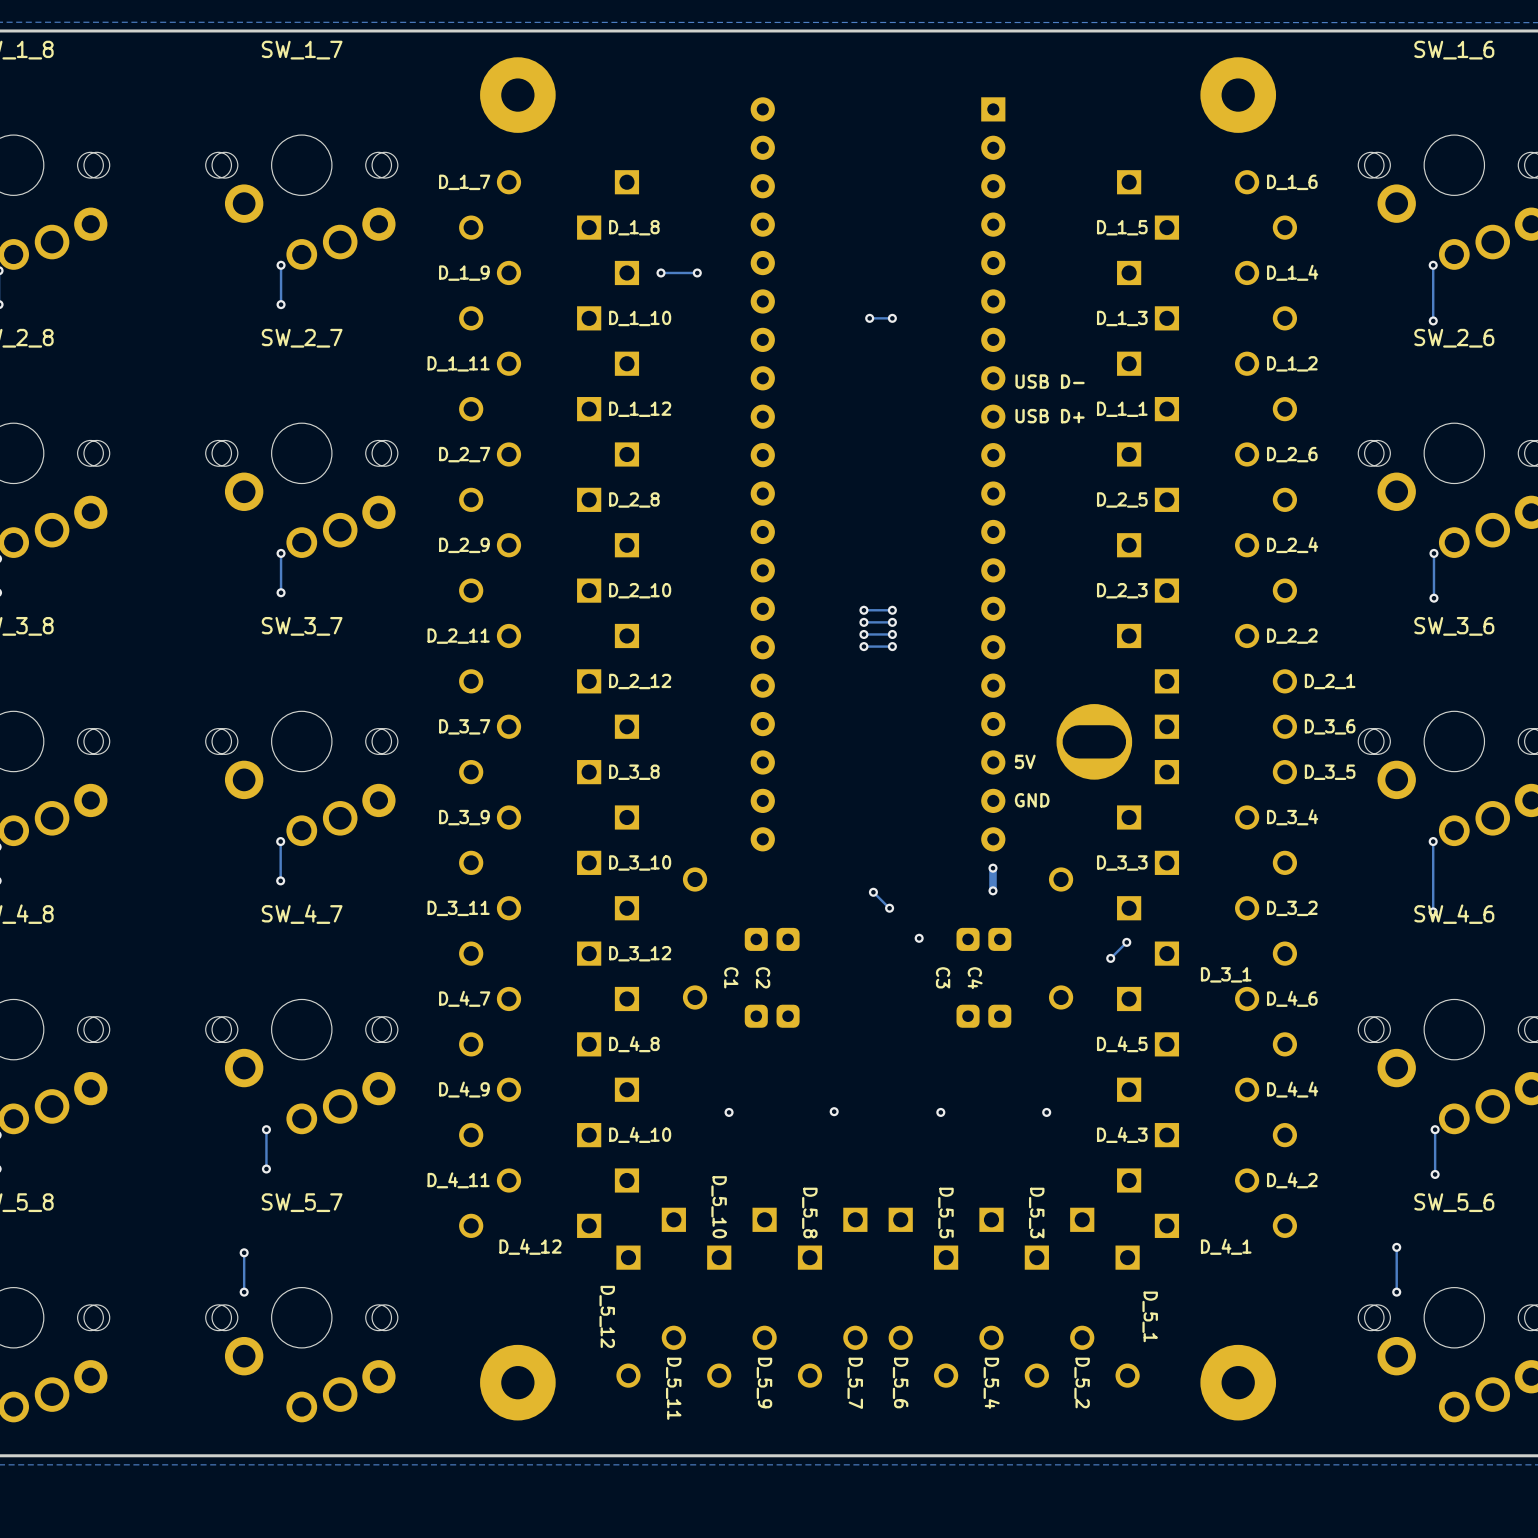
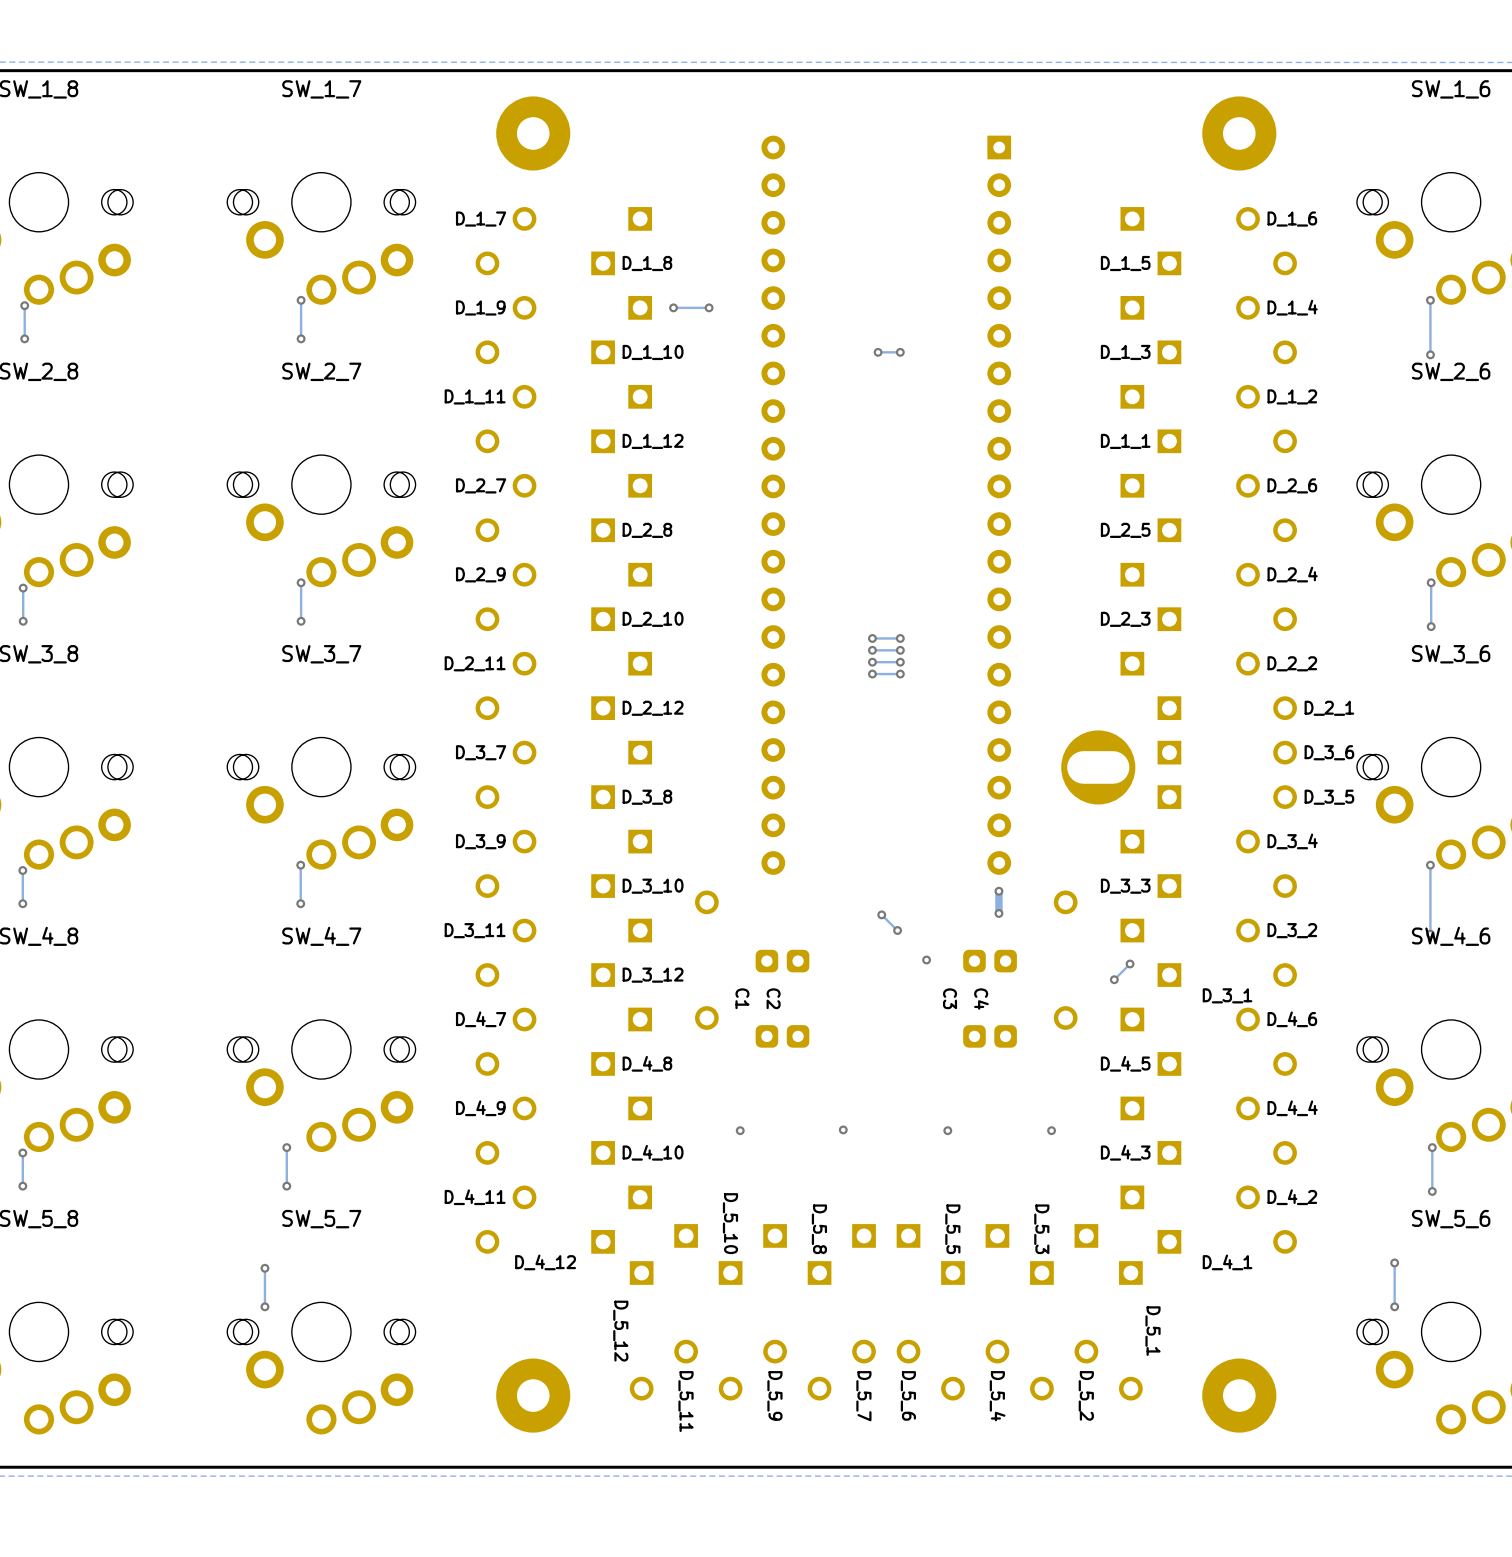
text: USB D- (1050, 381) -> none
text: USB D+ (1050, 416) -> none
text: 5V (1025, 761) -> none
text: GND (1032, 800) -> none

